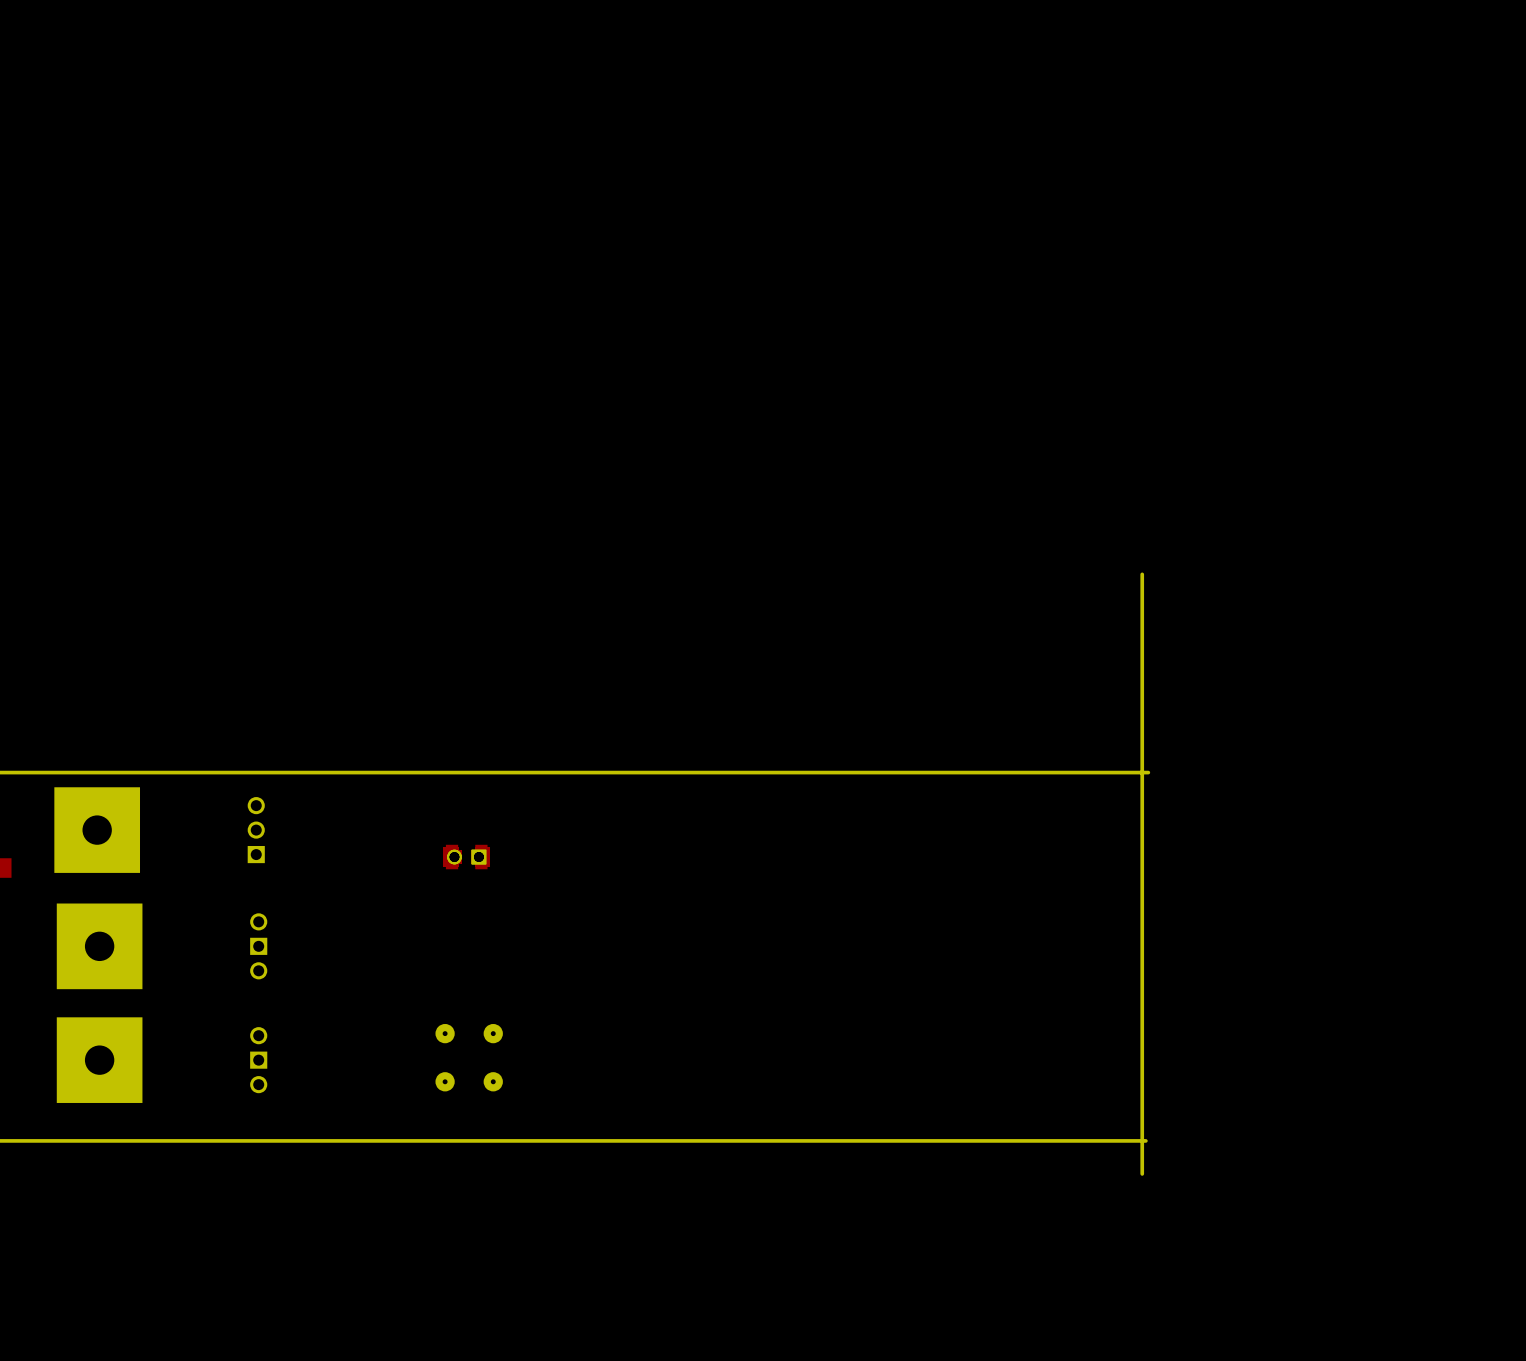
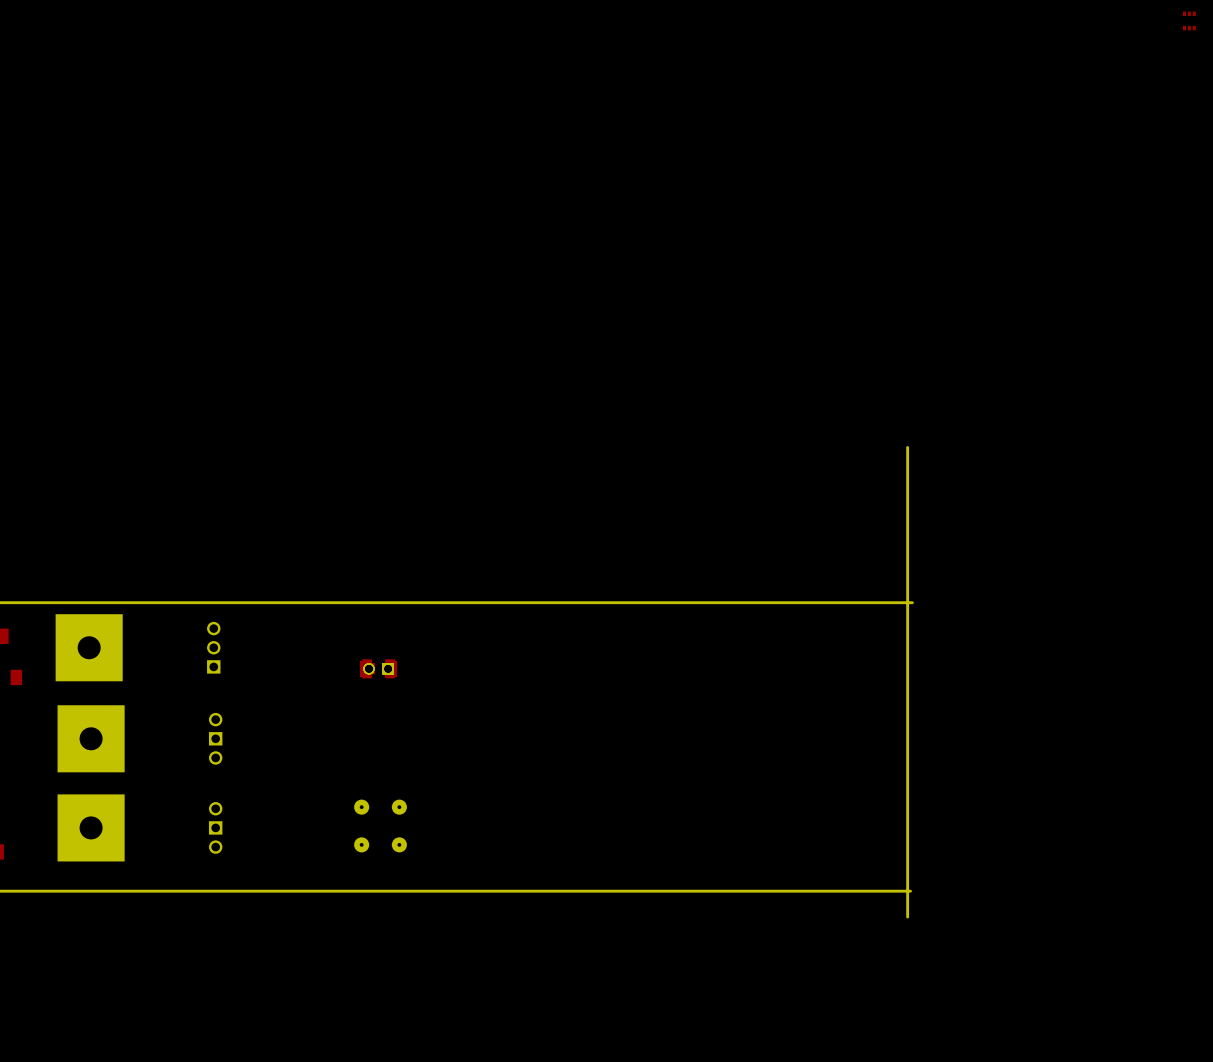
part: none -> (1189, 20)

